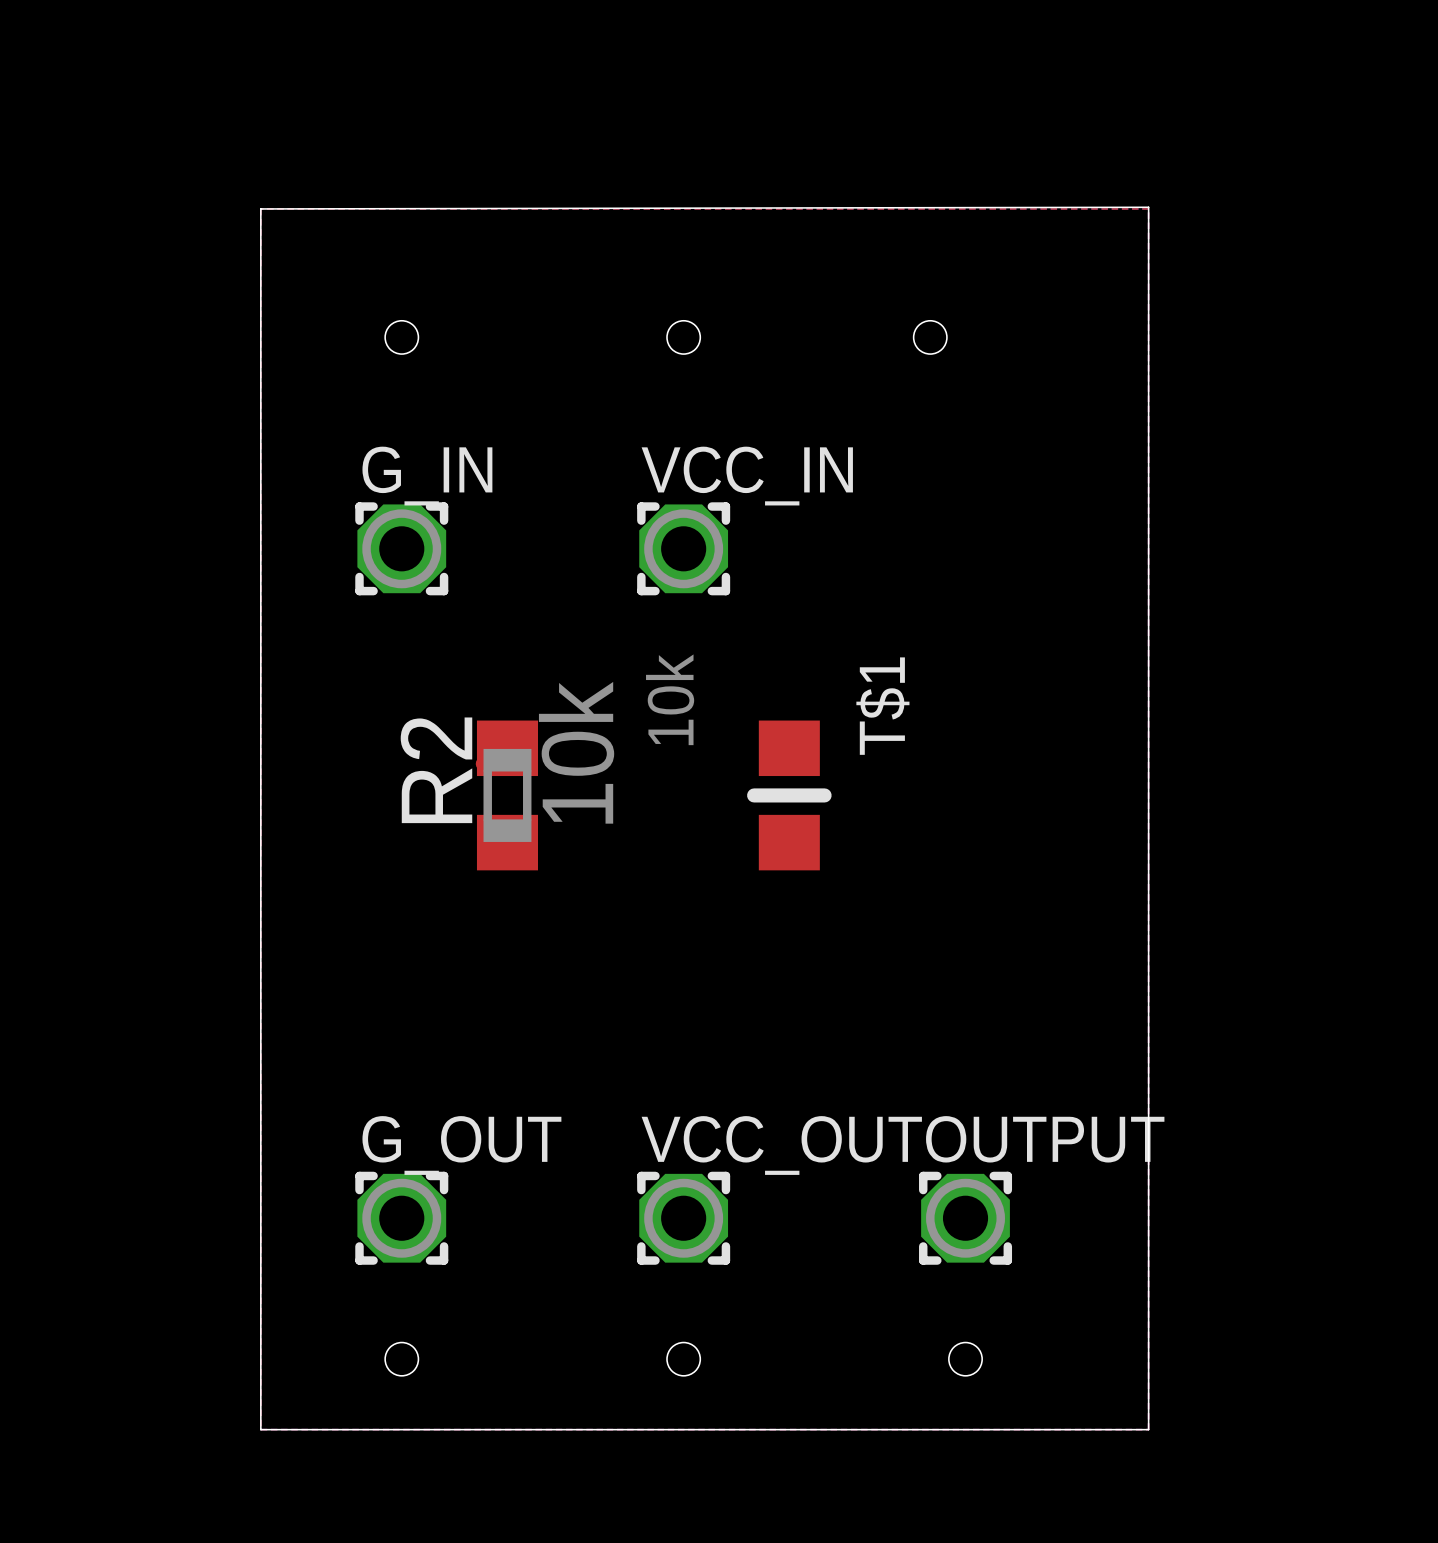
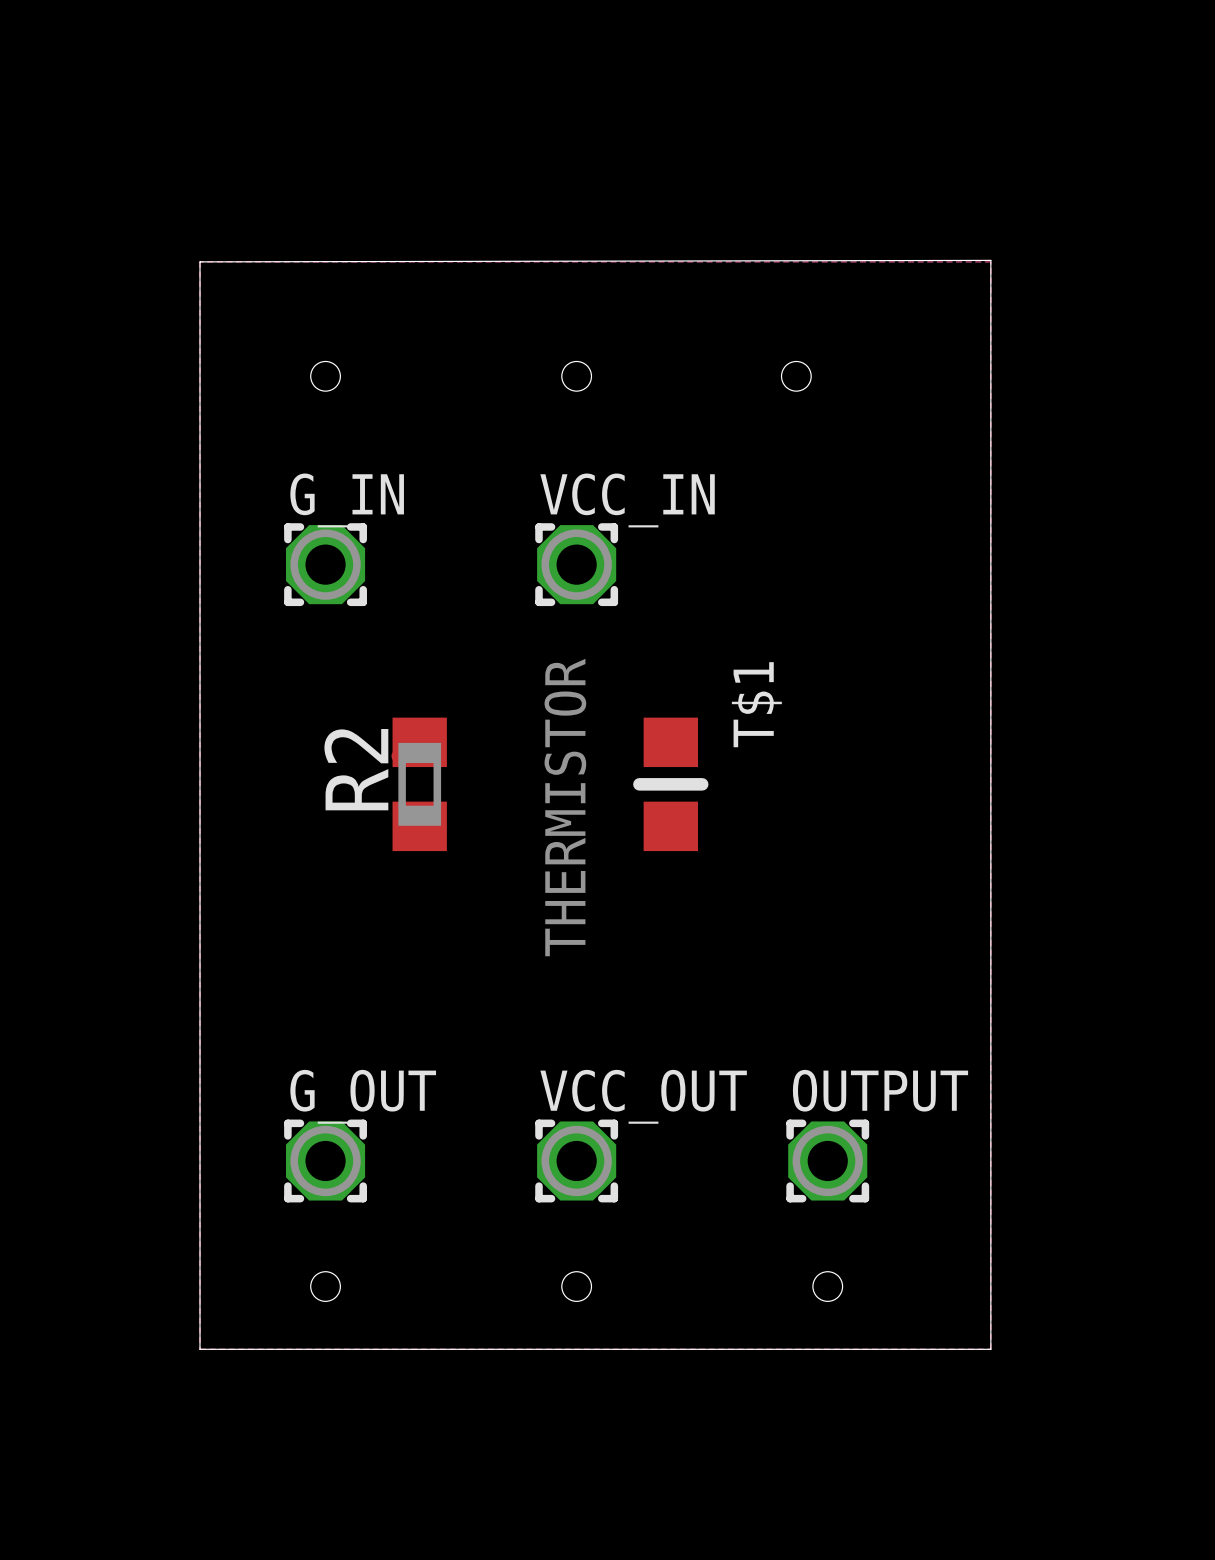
T$1 value: 10k (670, 699) -> THERMISTOR (565, 807)
R2 value: 10k (576, 752) -> none

